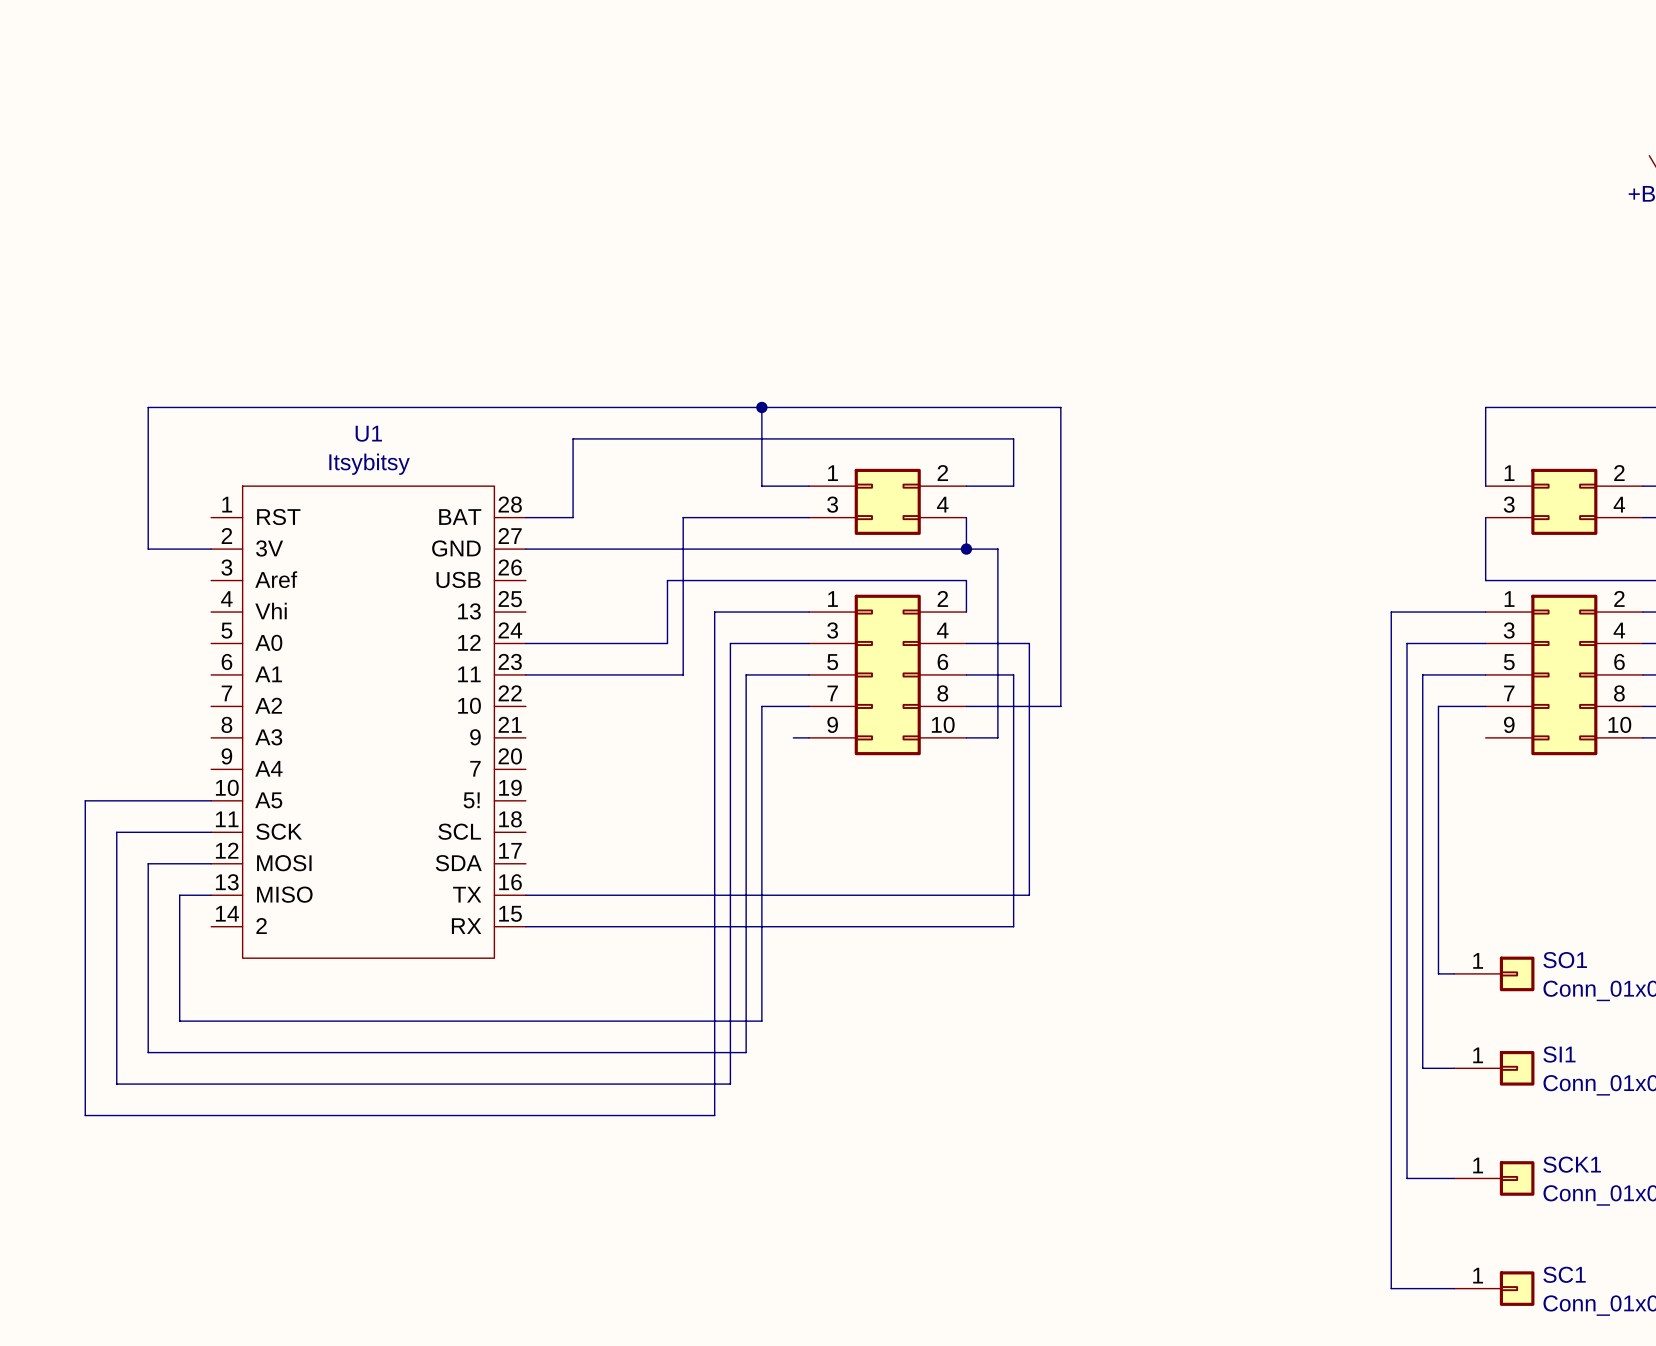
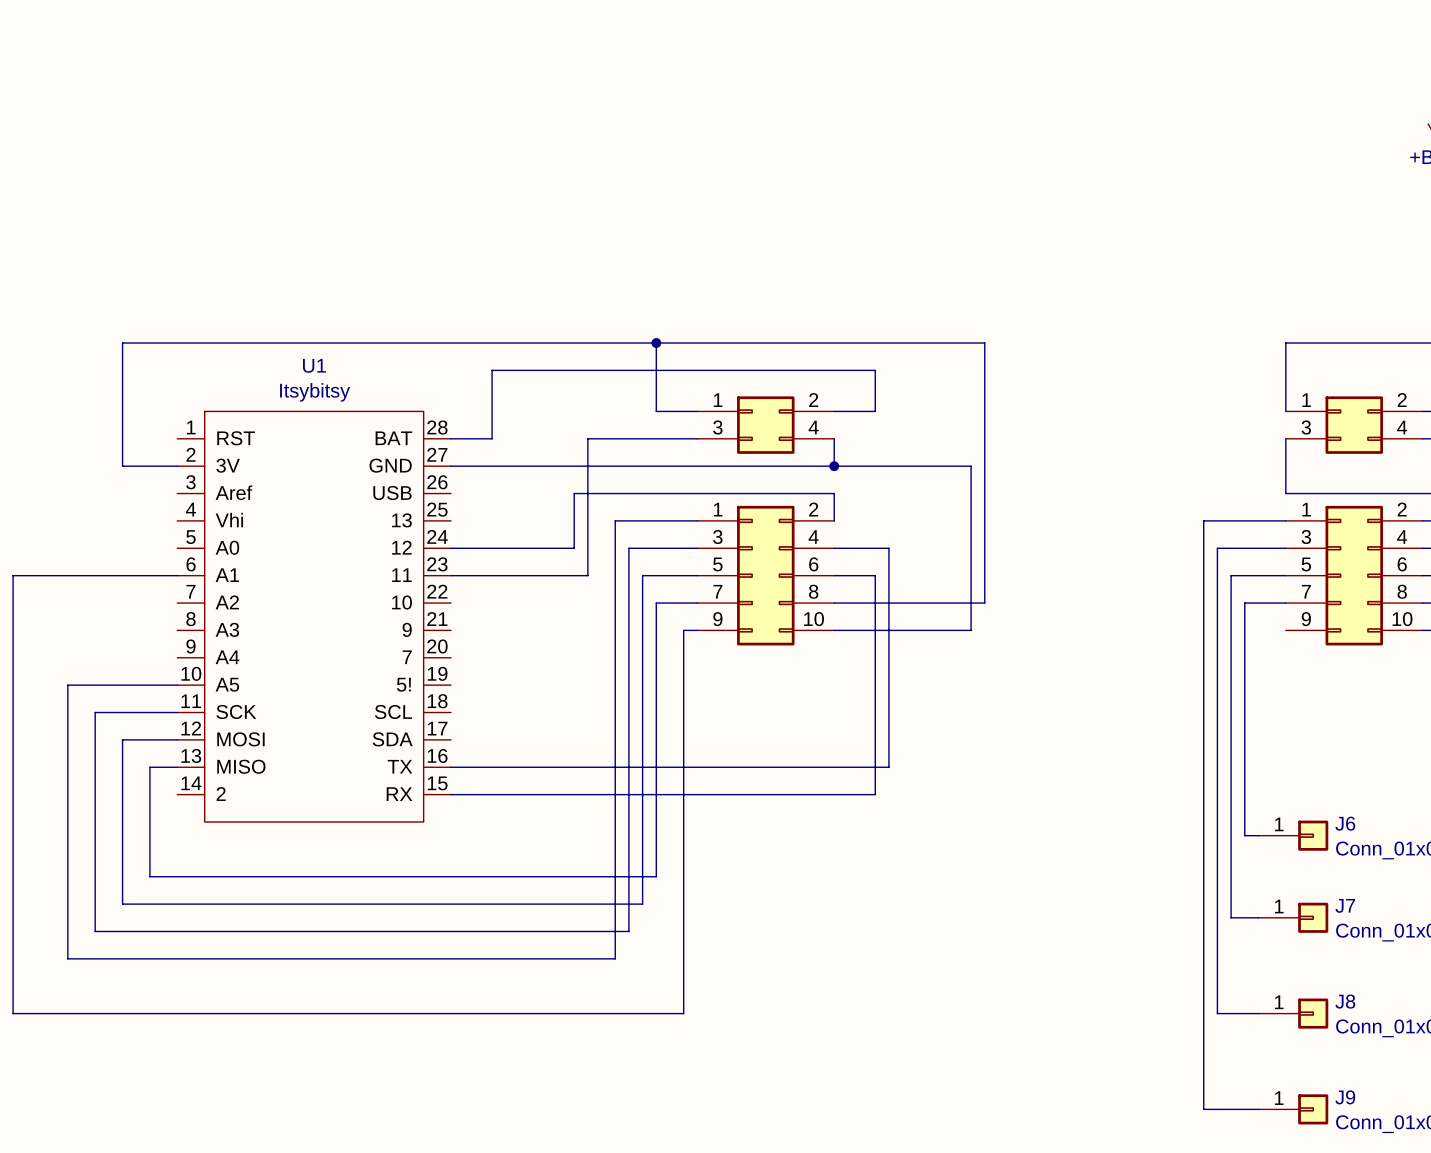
wire: (1060, 407) (1060, 706) -> (916, 343) (984, 343) (984, 603) (916, 603)
wire: (997, 549) (997, 737) -> (861, 466) (971, 466) (971, 630) (861, 630)
wire: none -> (177, 575) (13, 575) (13, 1013) (683, 1013) (683, 630)
SO1 name: SO1 (1565, 960) -> J6 (1345, 823)
SI1 name: SI1 (1559, 1054) -> J7 (1345, 905)
SCK1 name: SCK1 (1572, 1164) -> J8 (1345, 1001)
SC1 name: SC1 (1564, 1274) -> J9 (1345, 1097)

